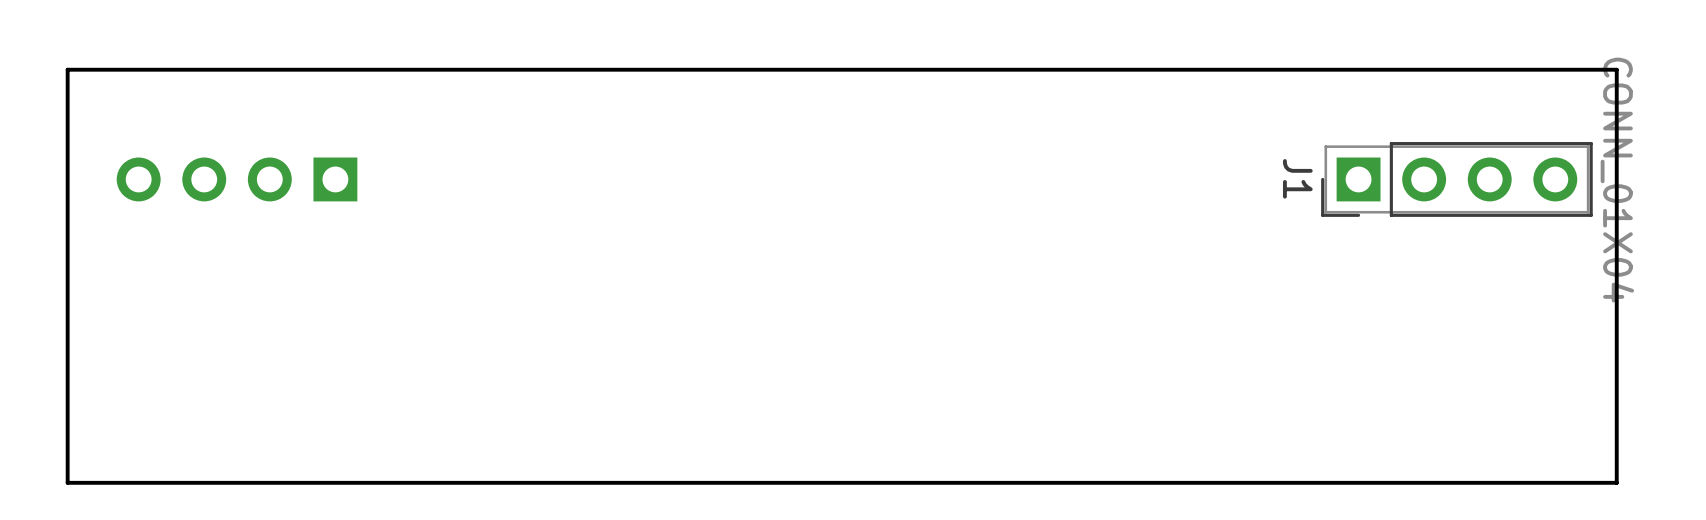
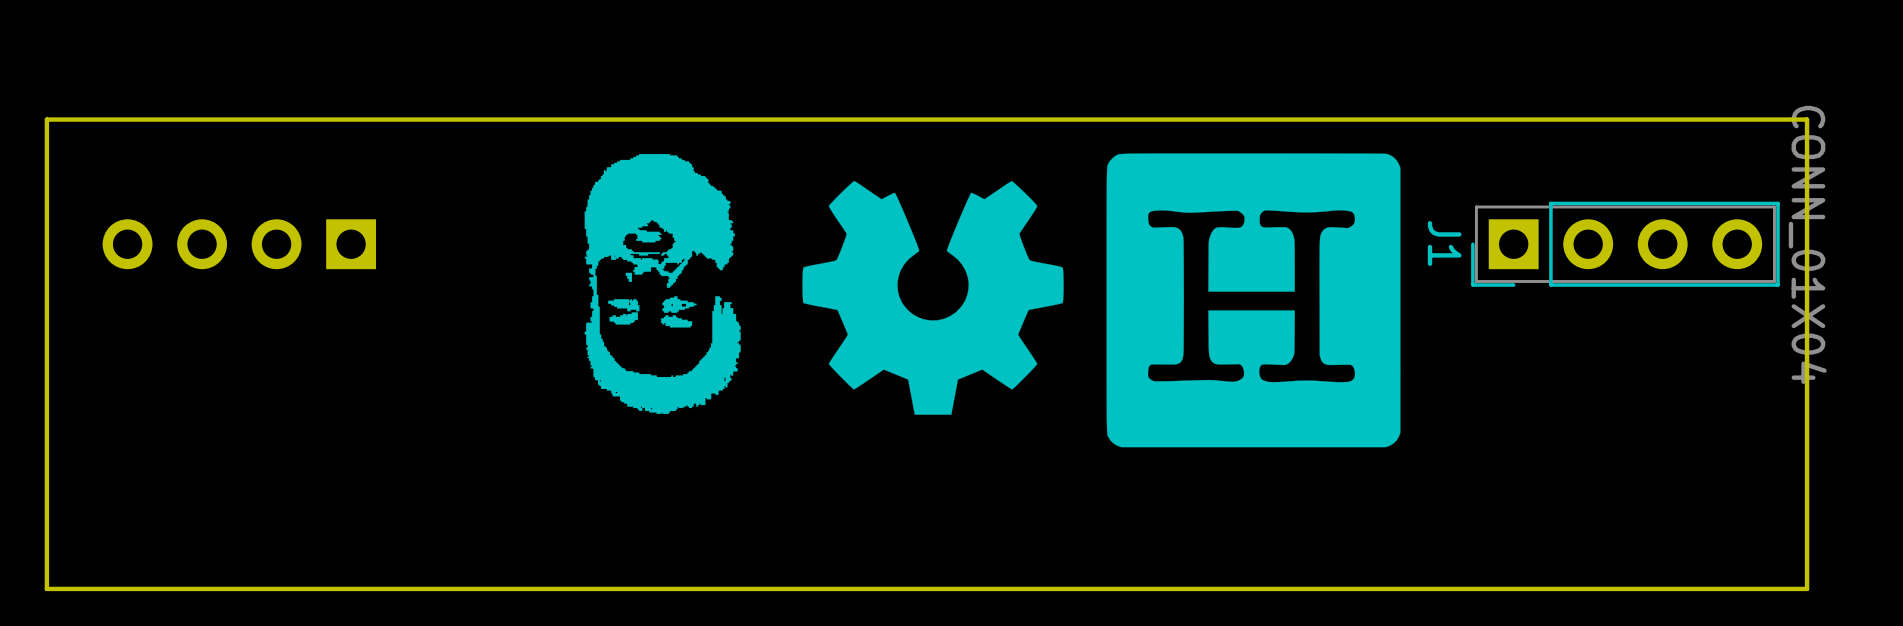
drawing: none -> [1106, 153, 1401, 448]
drawing: none -> [584, 154, 741, 414]
drawing: none -> [802, 181, 1064, 415]

